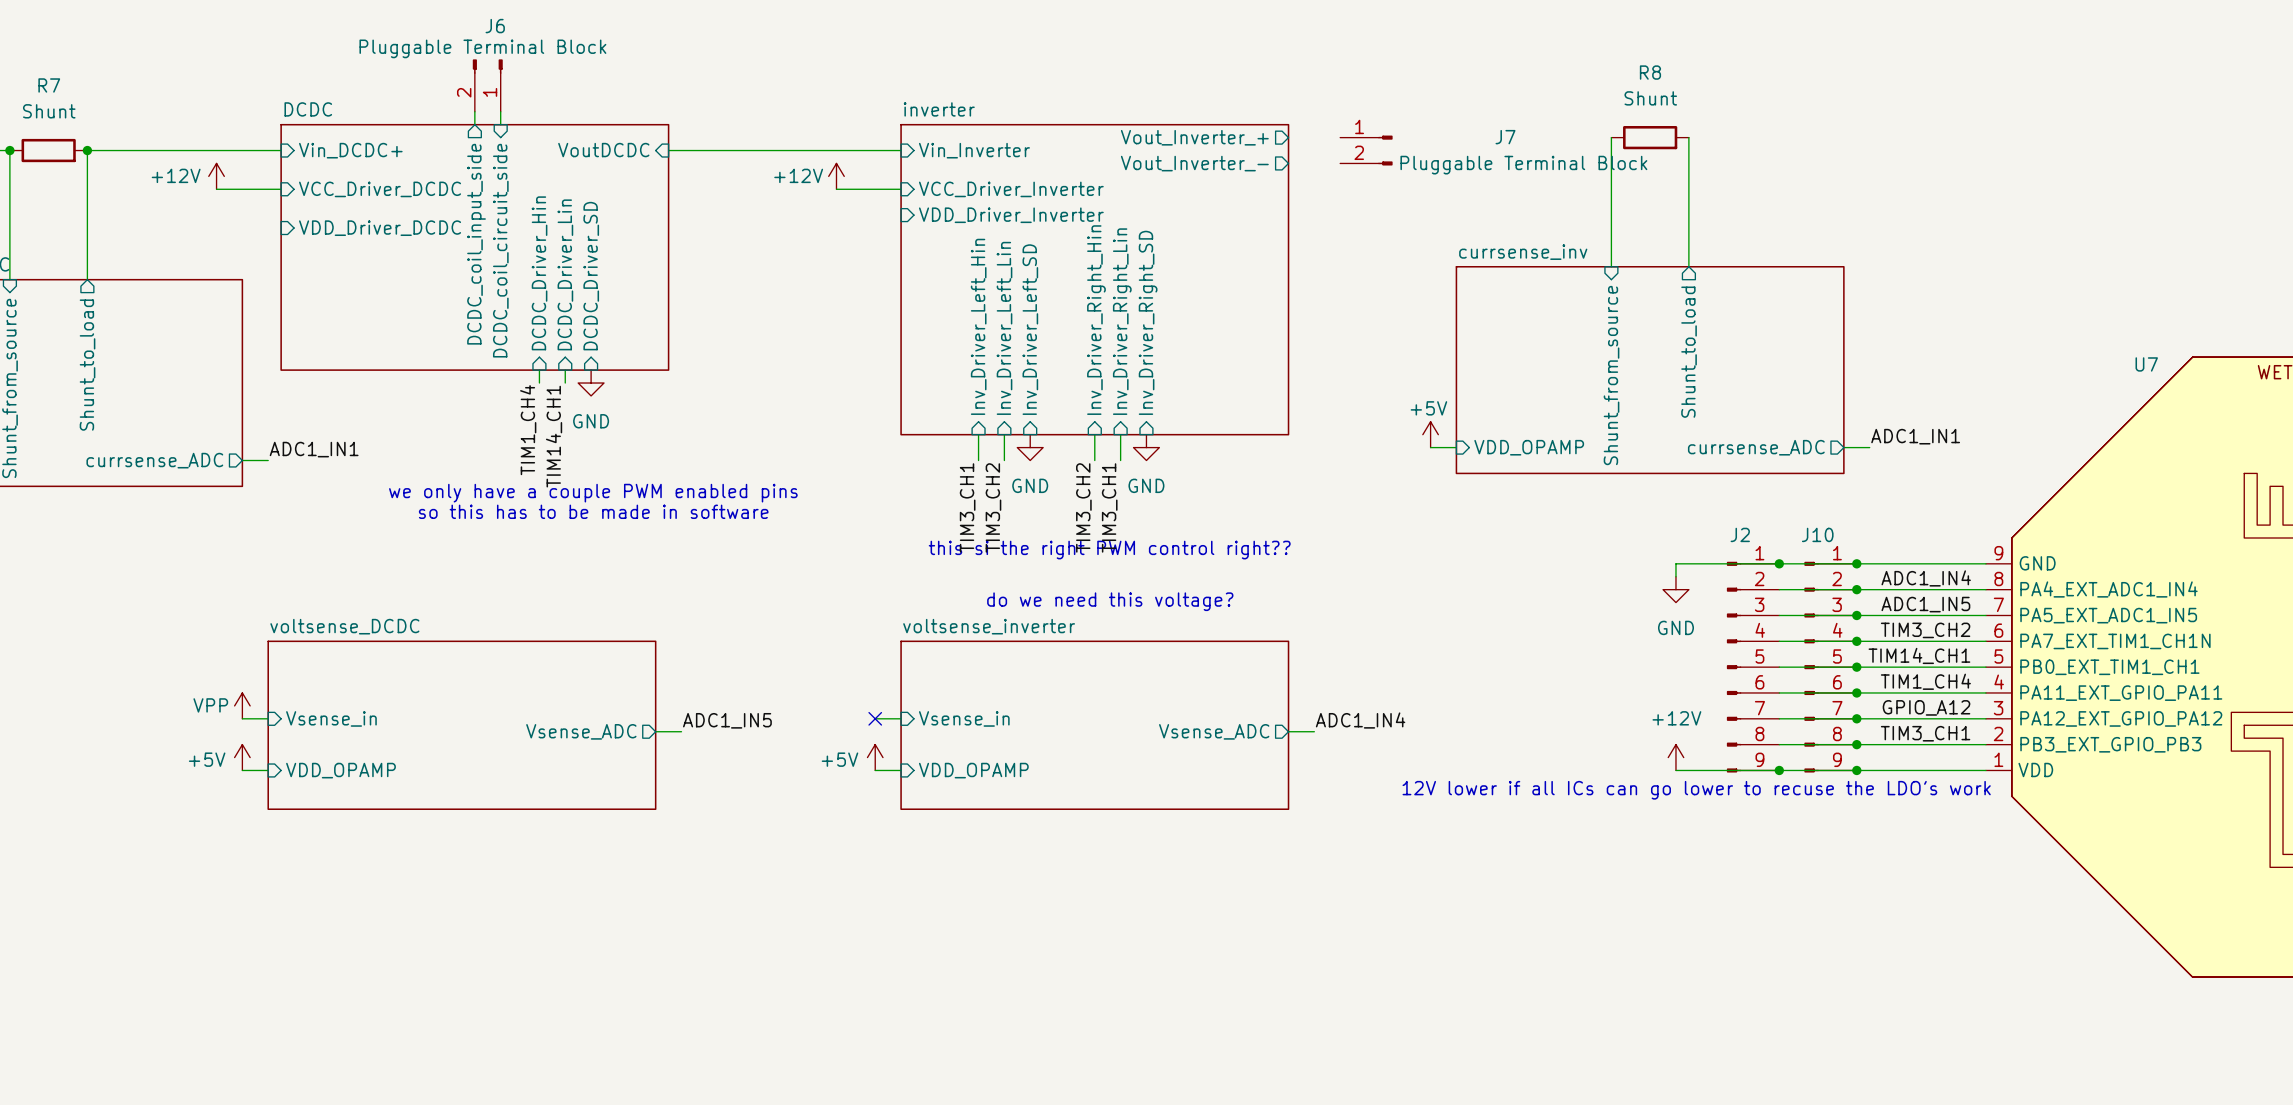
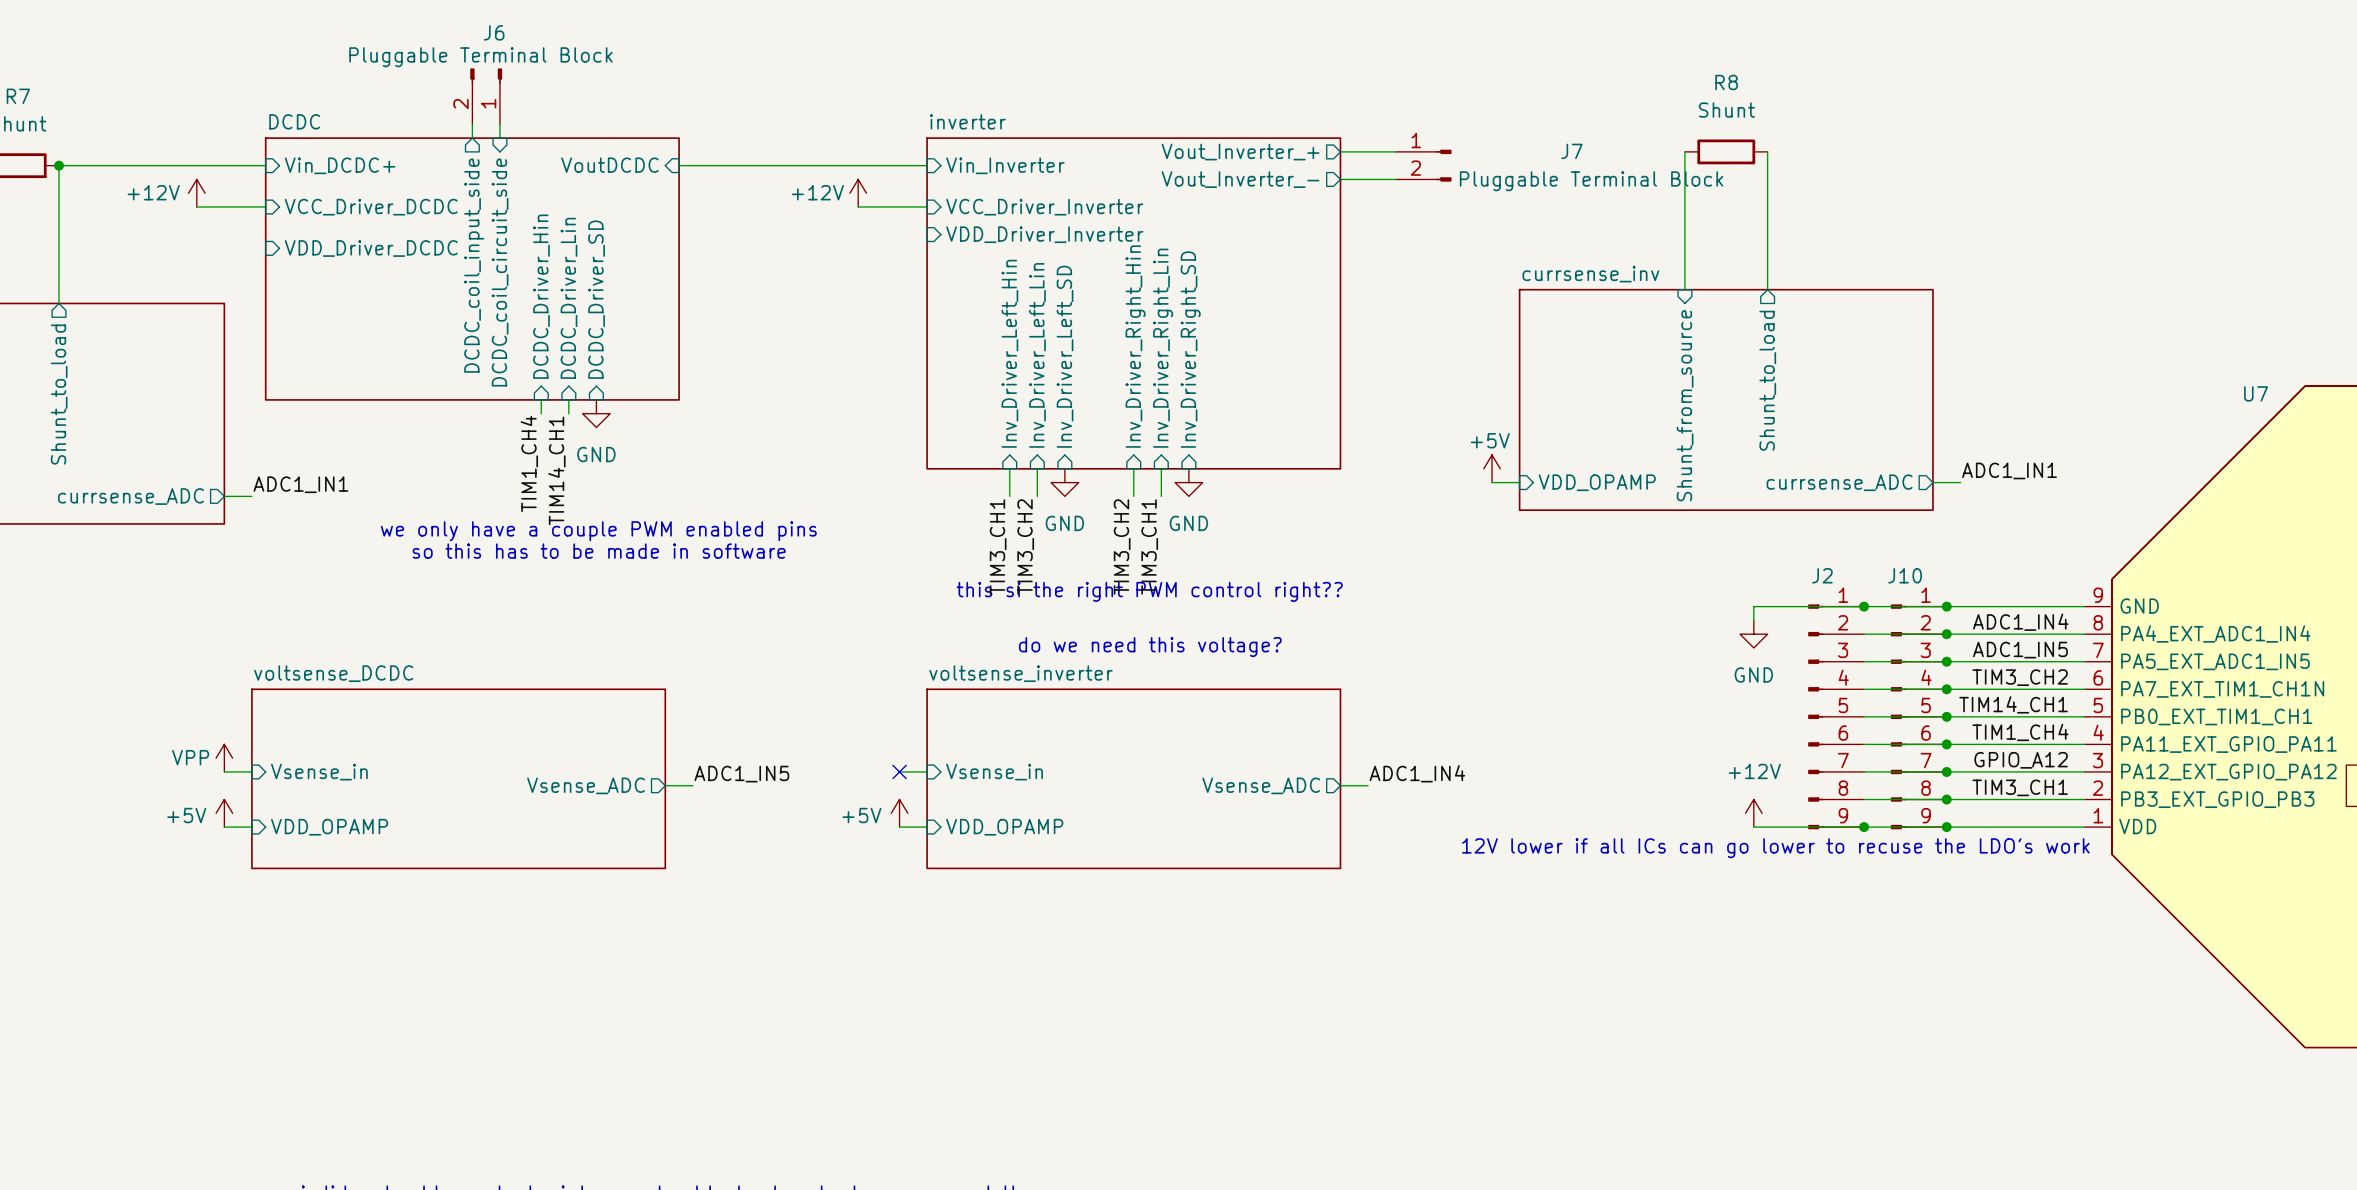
wire: none -> (1340, 151) (1395, 151)
wire: none -> (1340, 179) (1395, 179)

